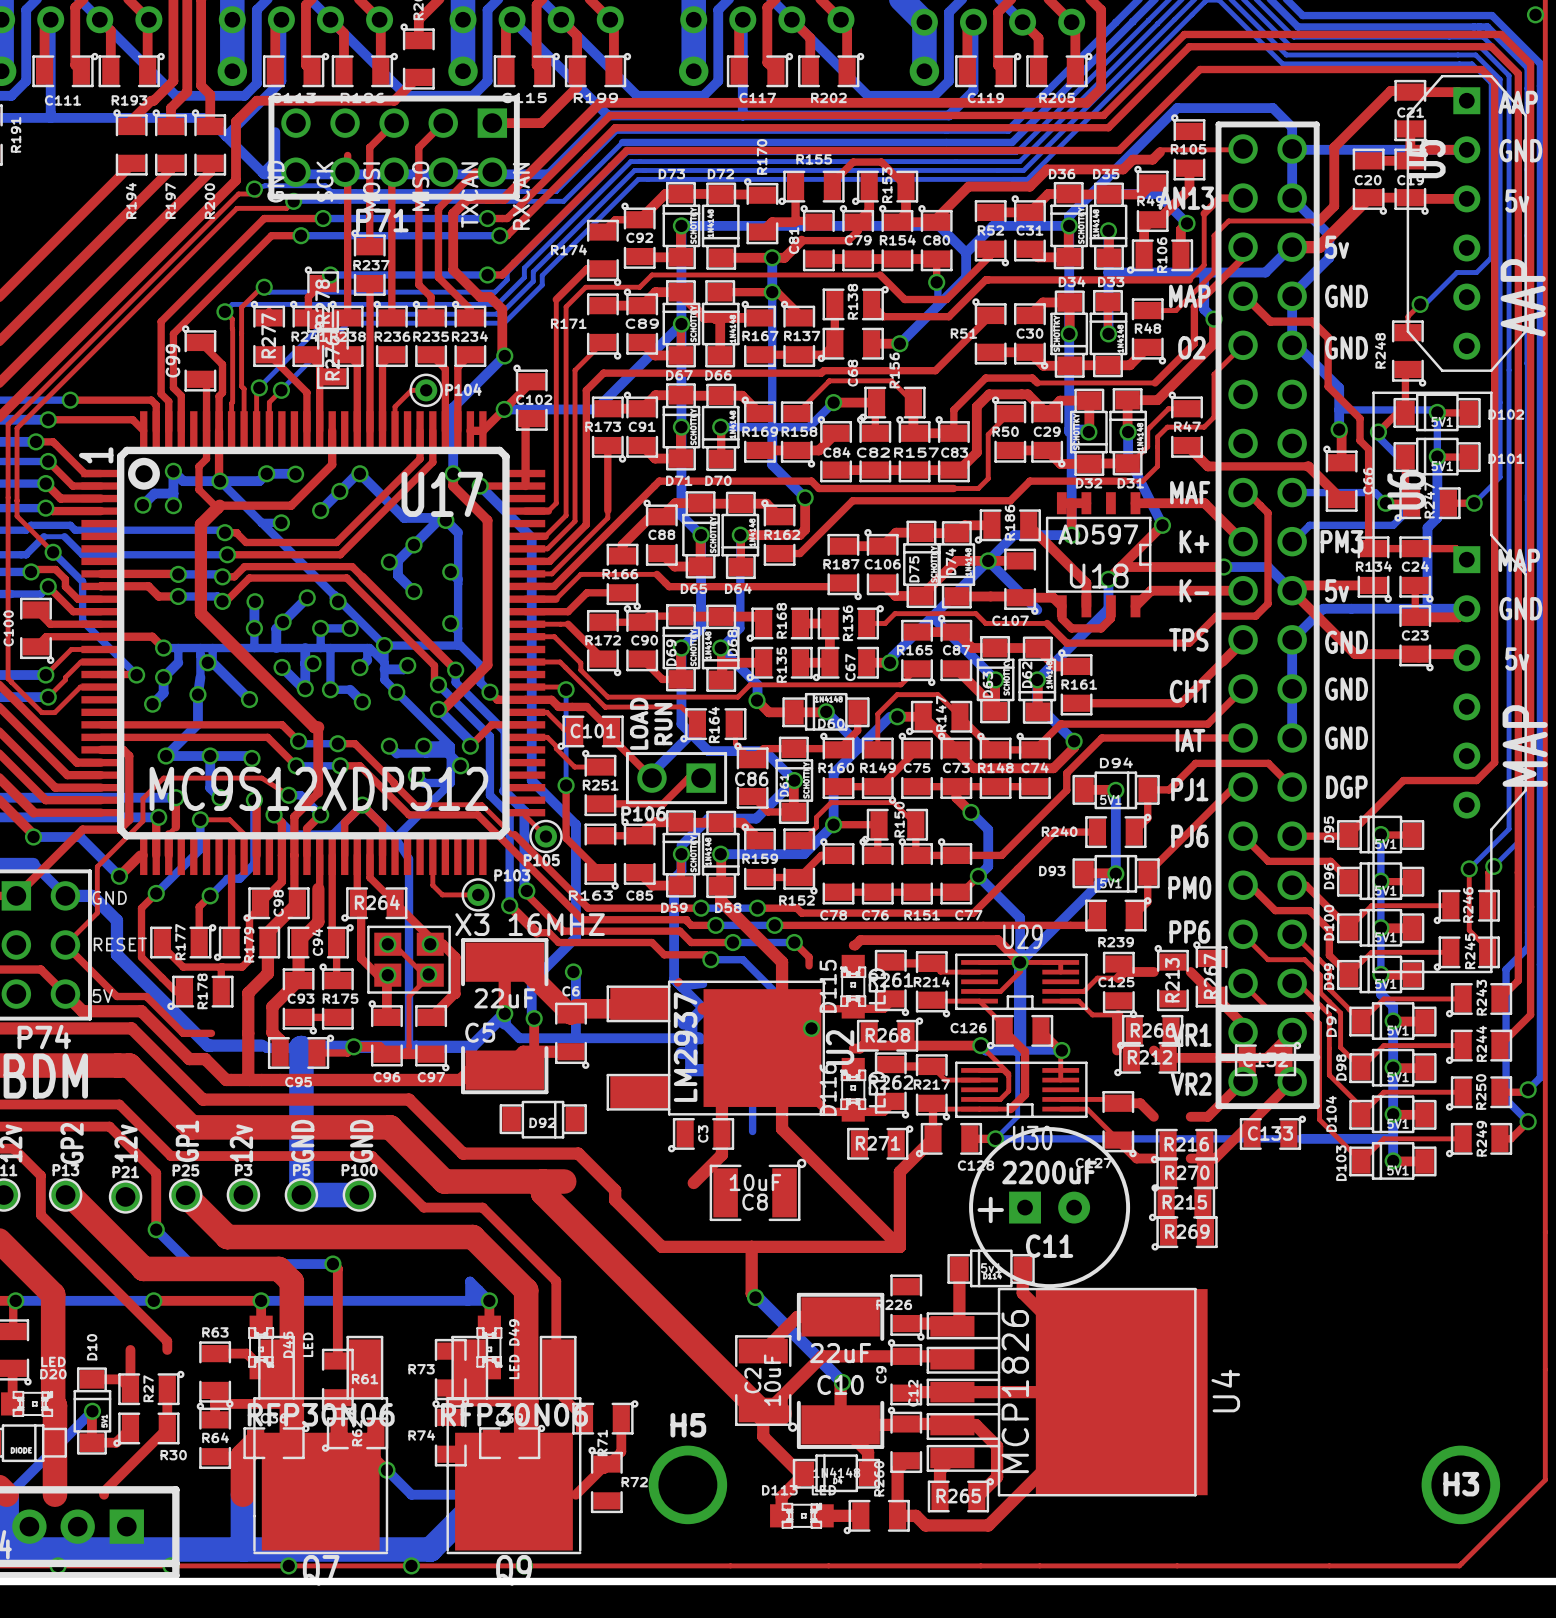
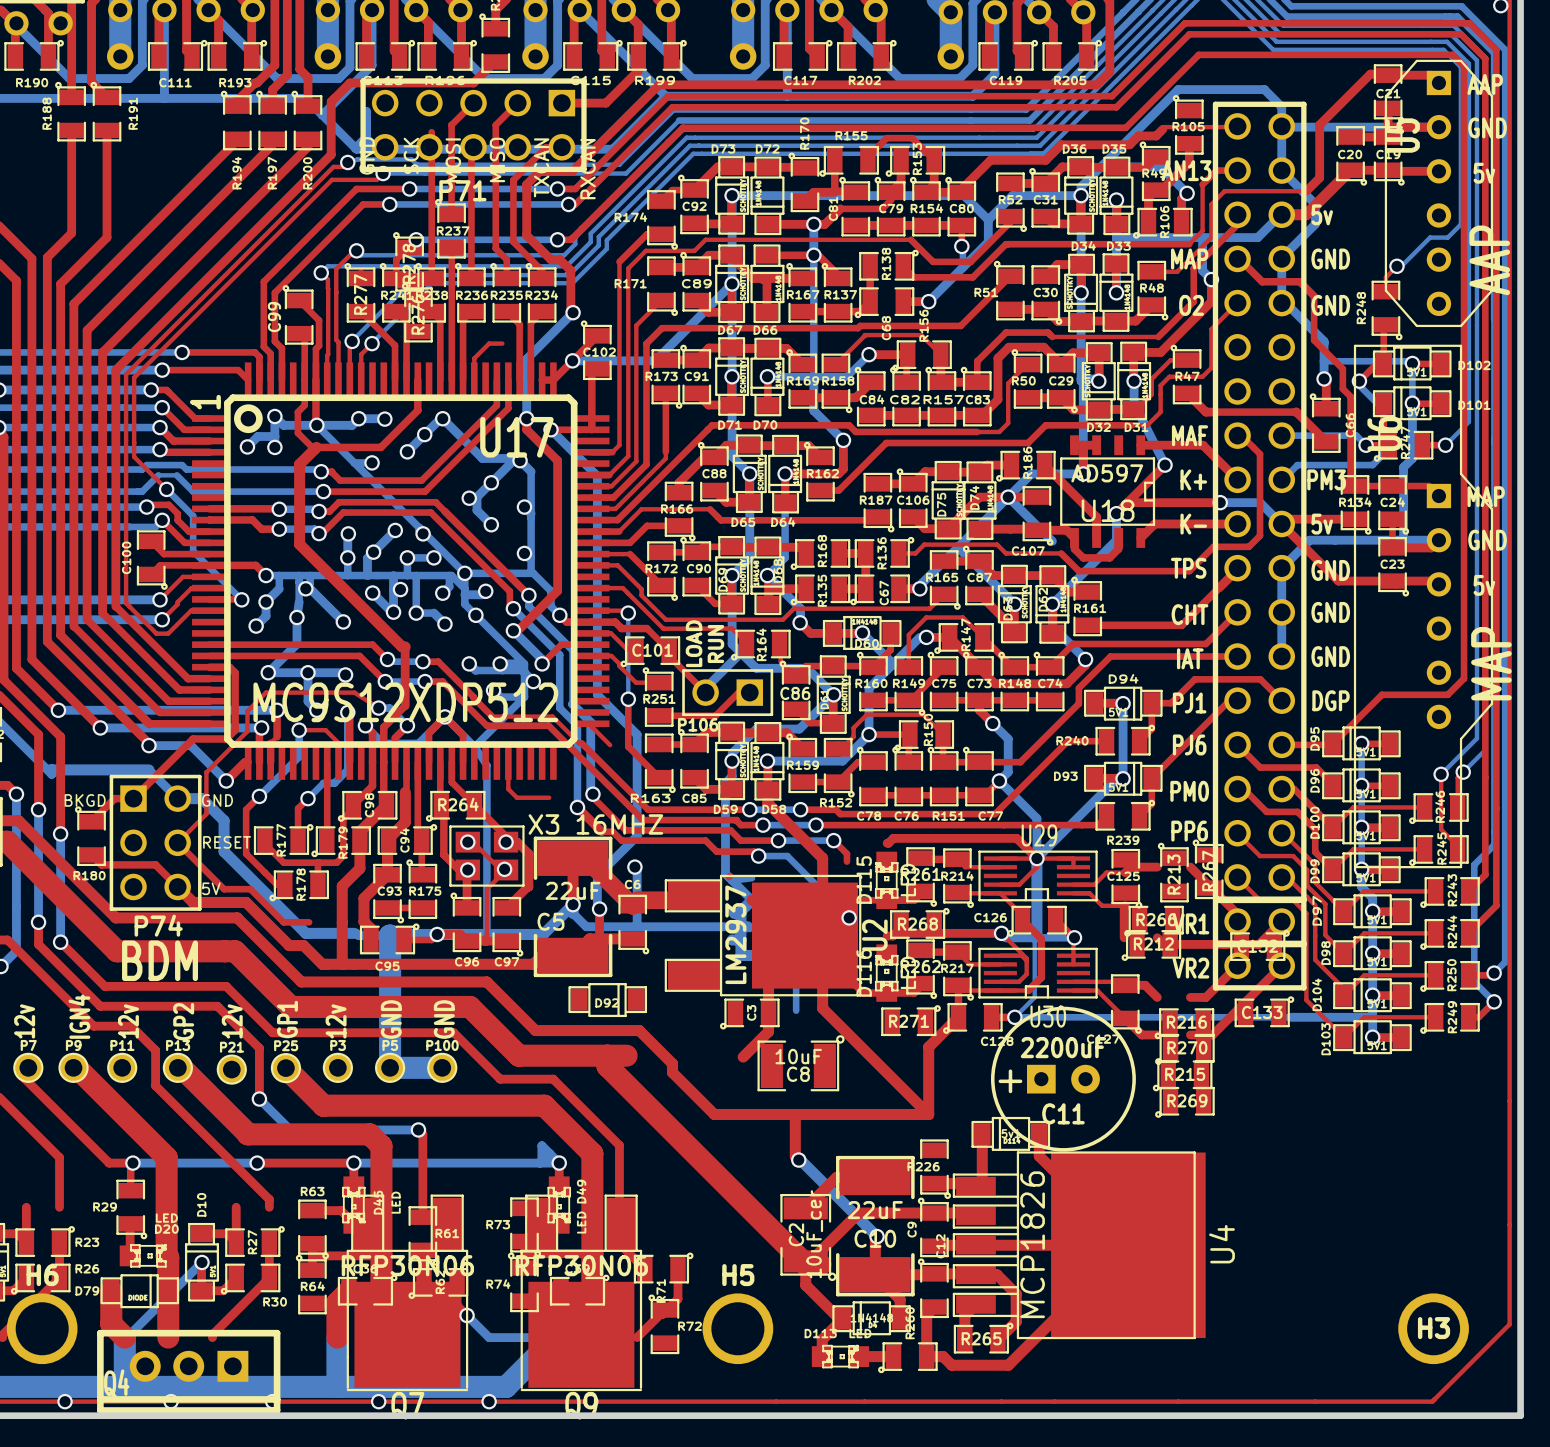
P104: (426, 390) -> none
P105: (545, 836) -> none
P103: (478, 894) -> none
C2 value: 10uF (772, 1380) -> 10uF_cer (814, 1234)

